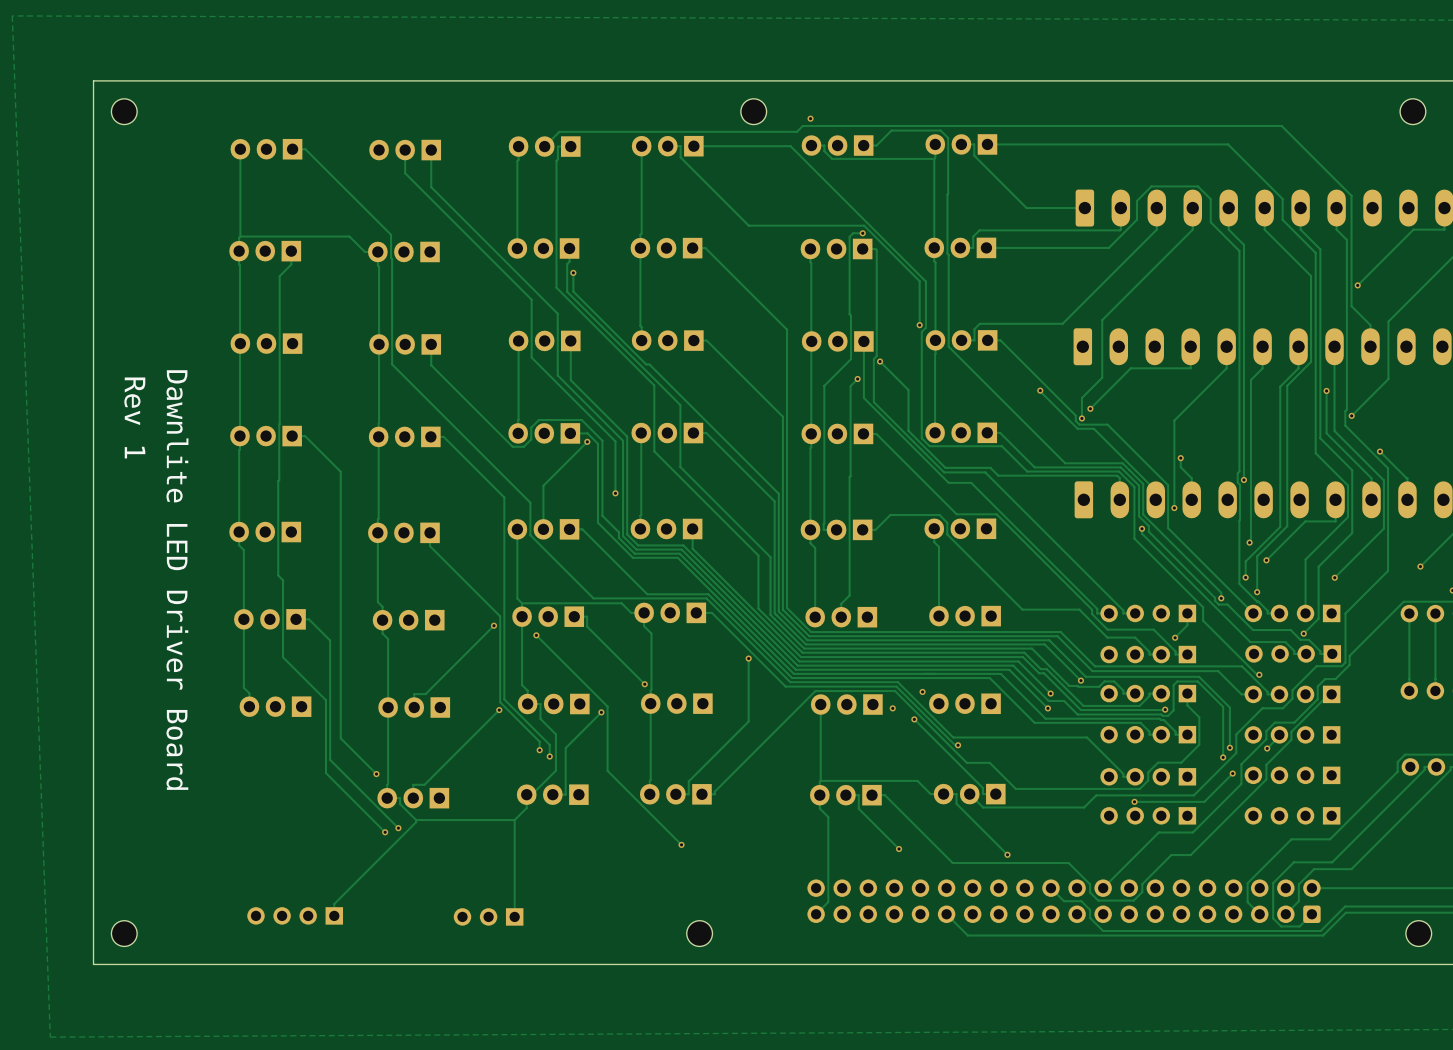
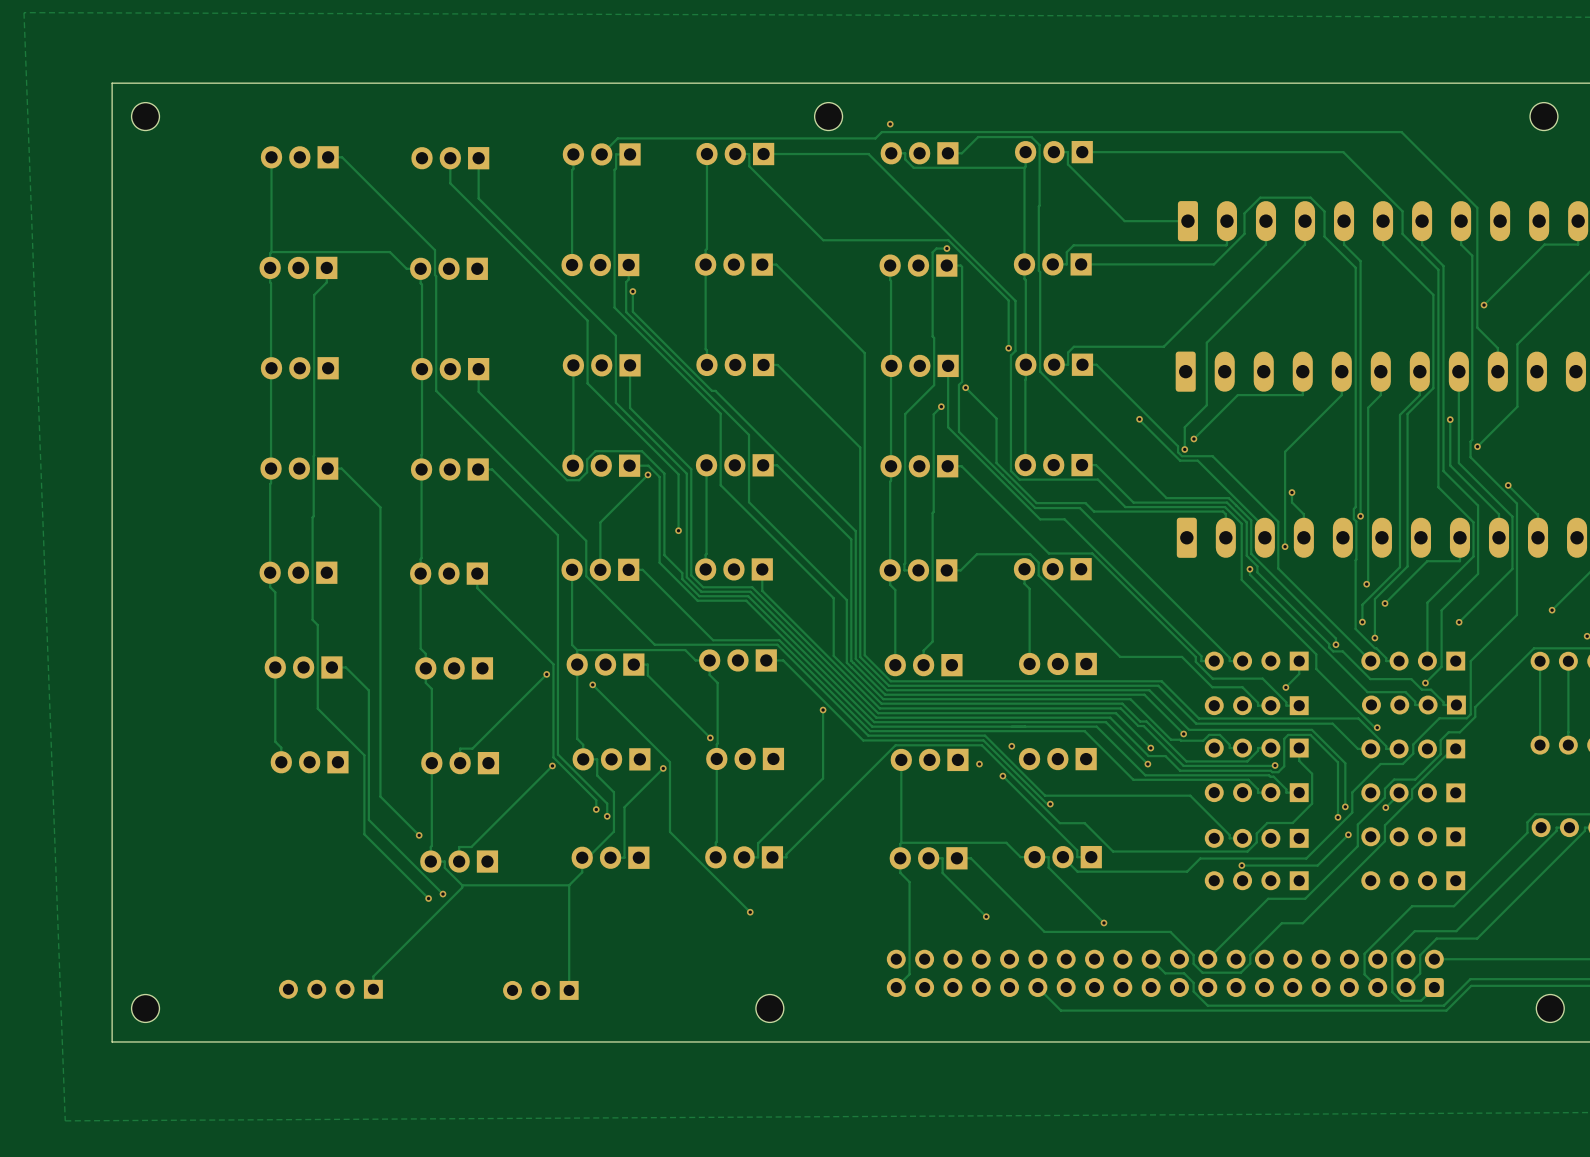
text: Rev 1 (134, 417) -> none
text: Dawnlite LED Driver Board (177, 580) -> none

